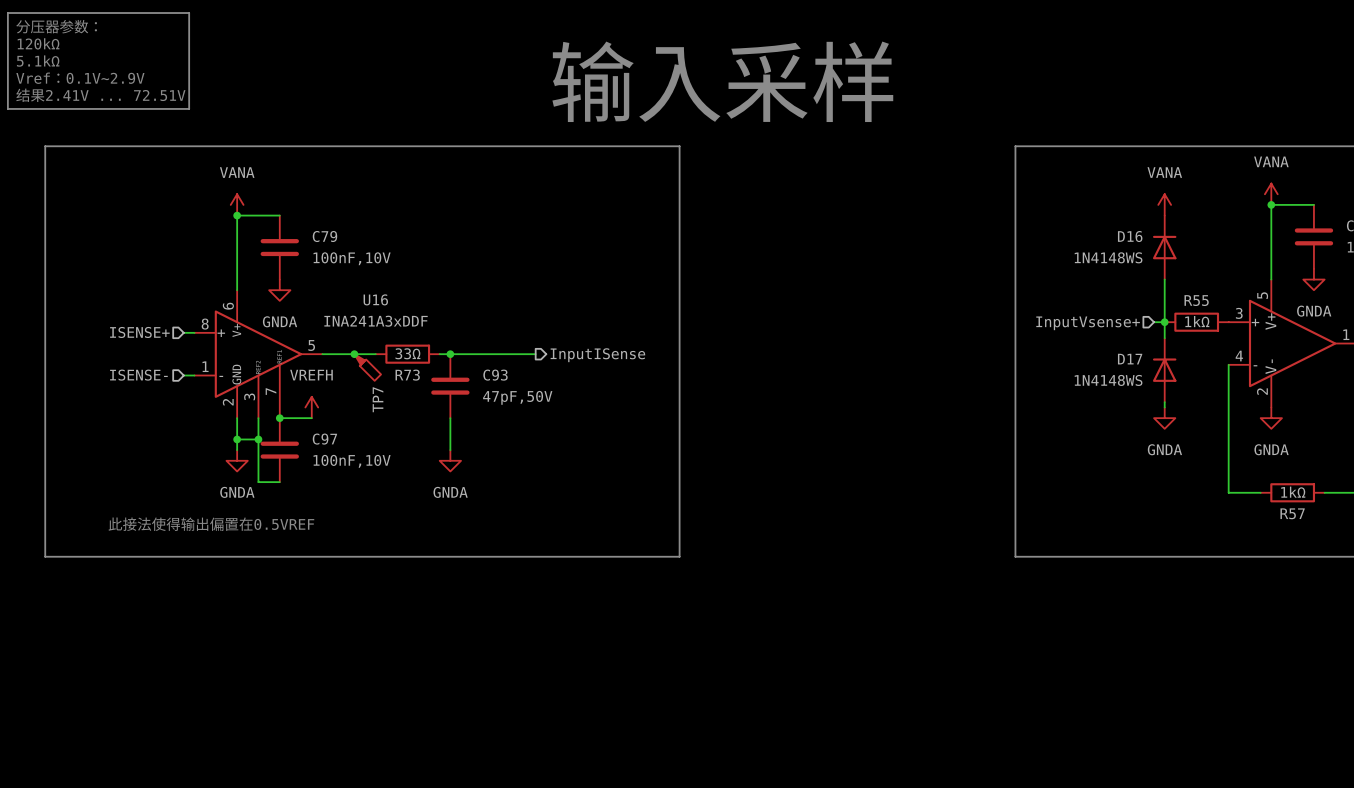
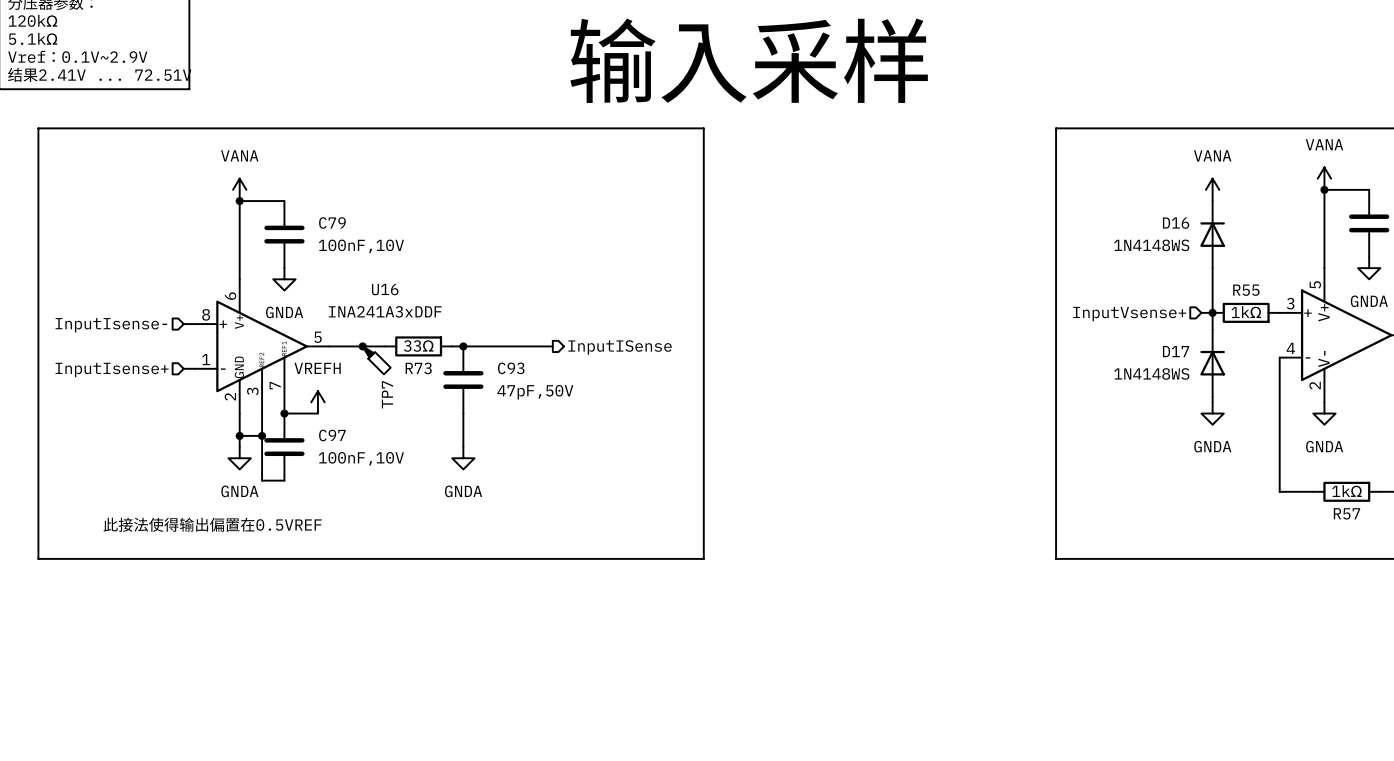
hierarchical label: ISENSE+ (139, 332) -> InputIsense- (111, 325)
hierarchical label: ISENSE- (138, 375) -> InputIsense+ (112, 369)

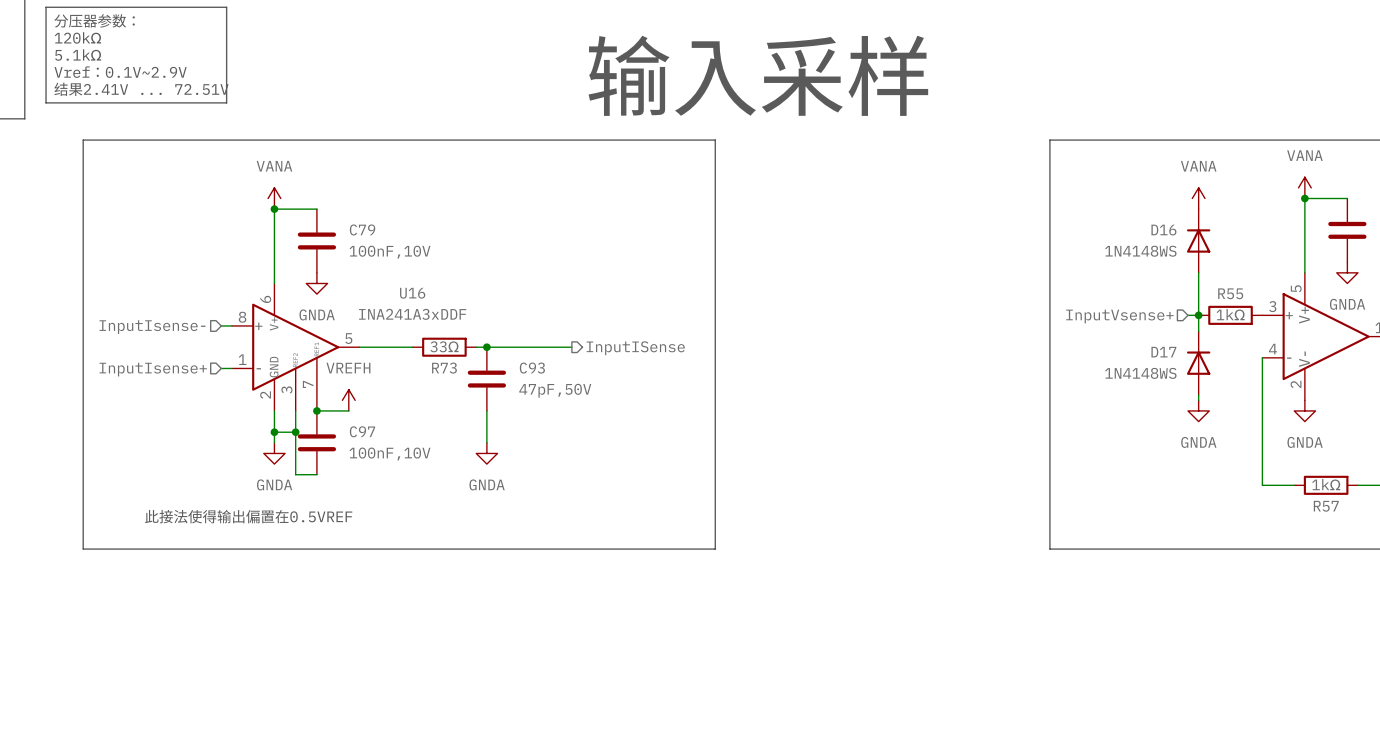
junction: (362, 346) -> none
TP7: (376, 360) -> none

